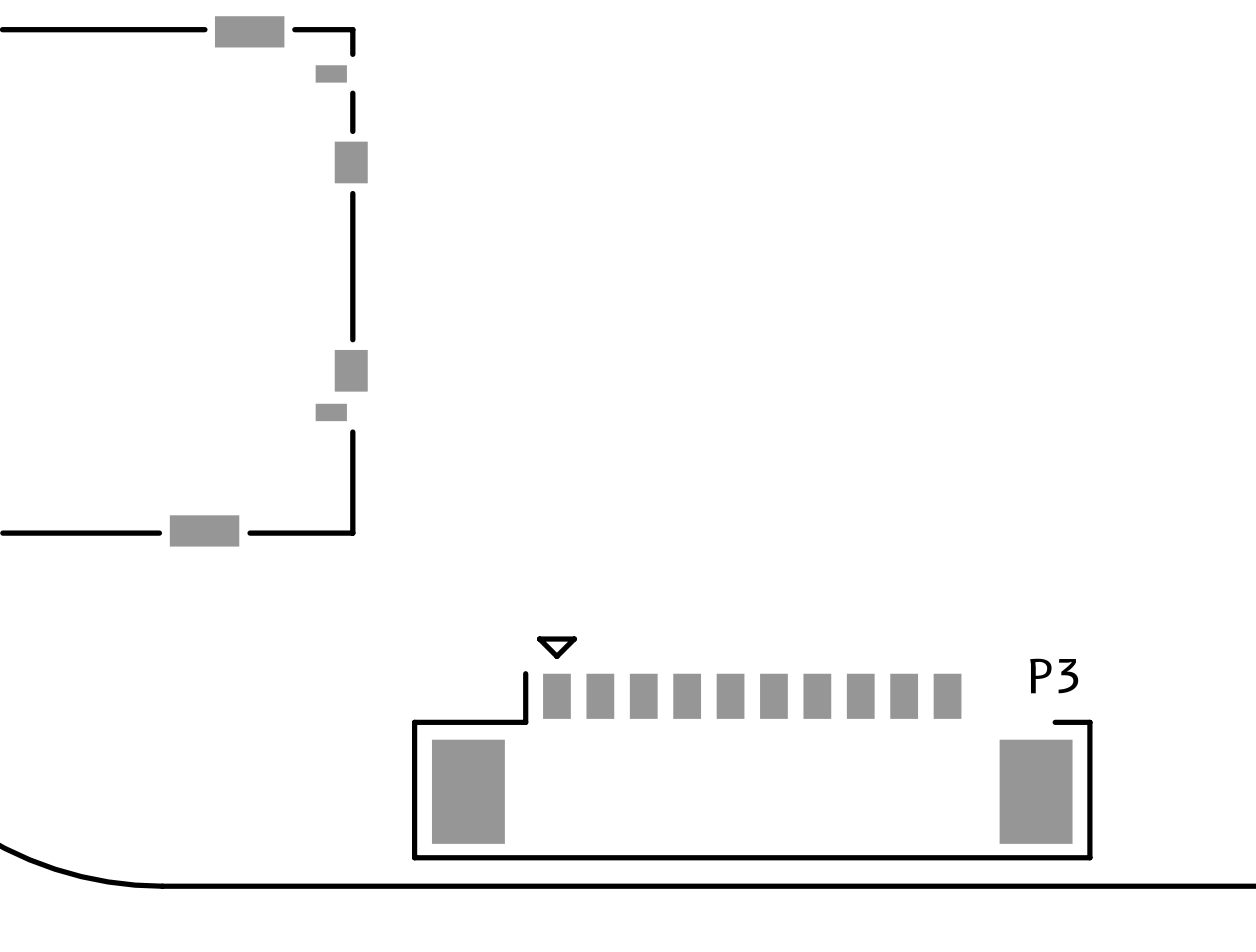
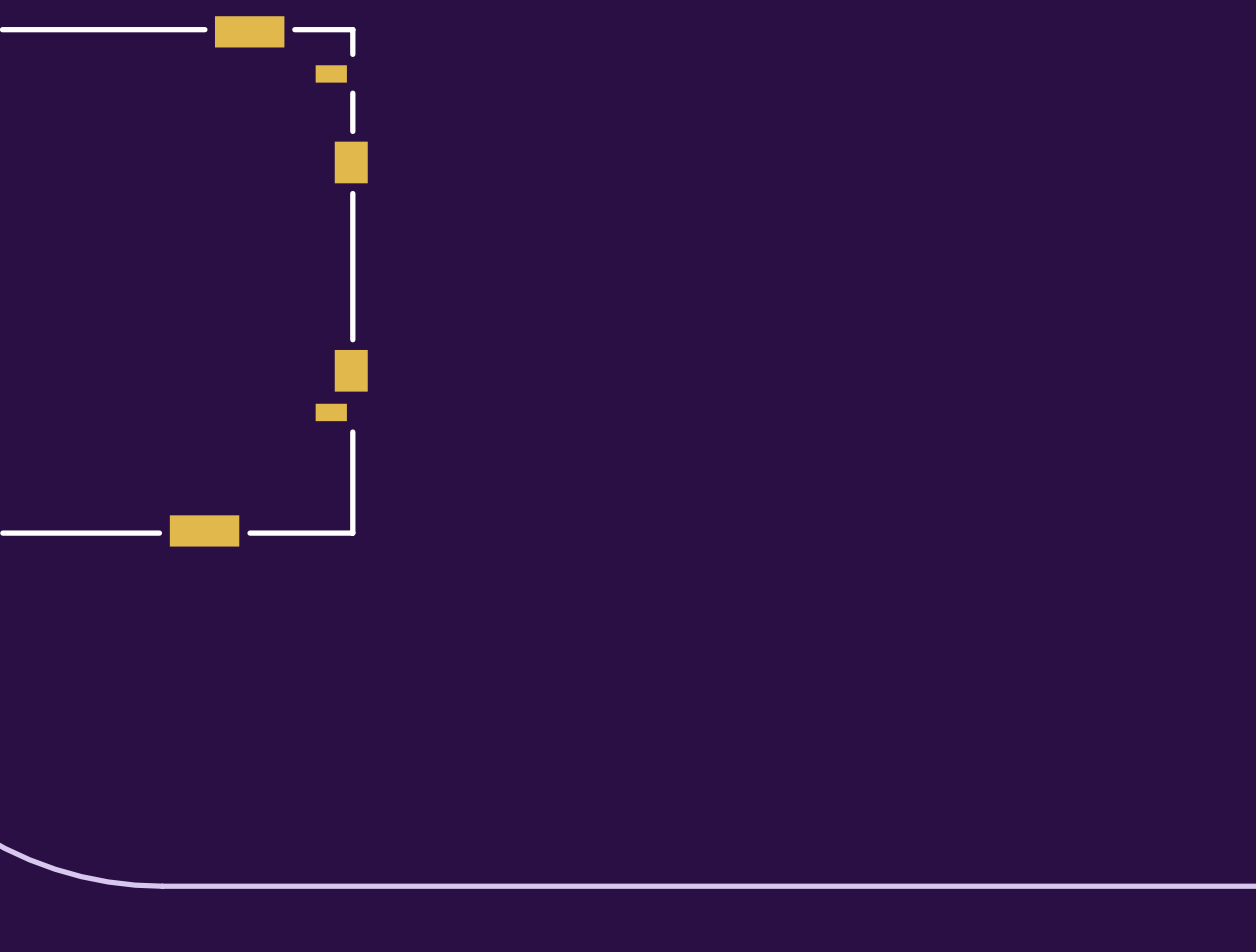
P3: (752, 748) -> none

